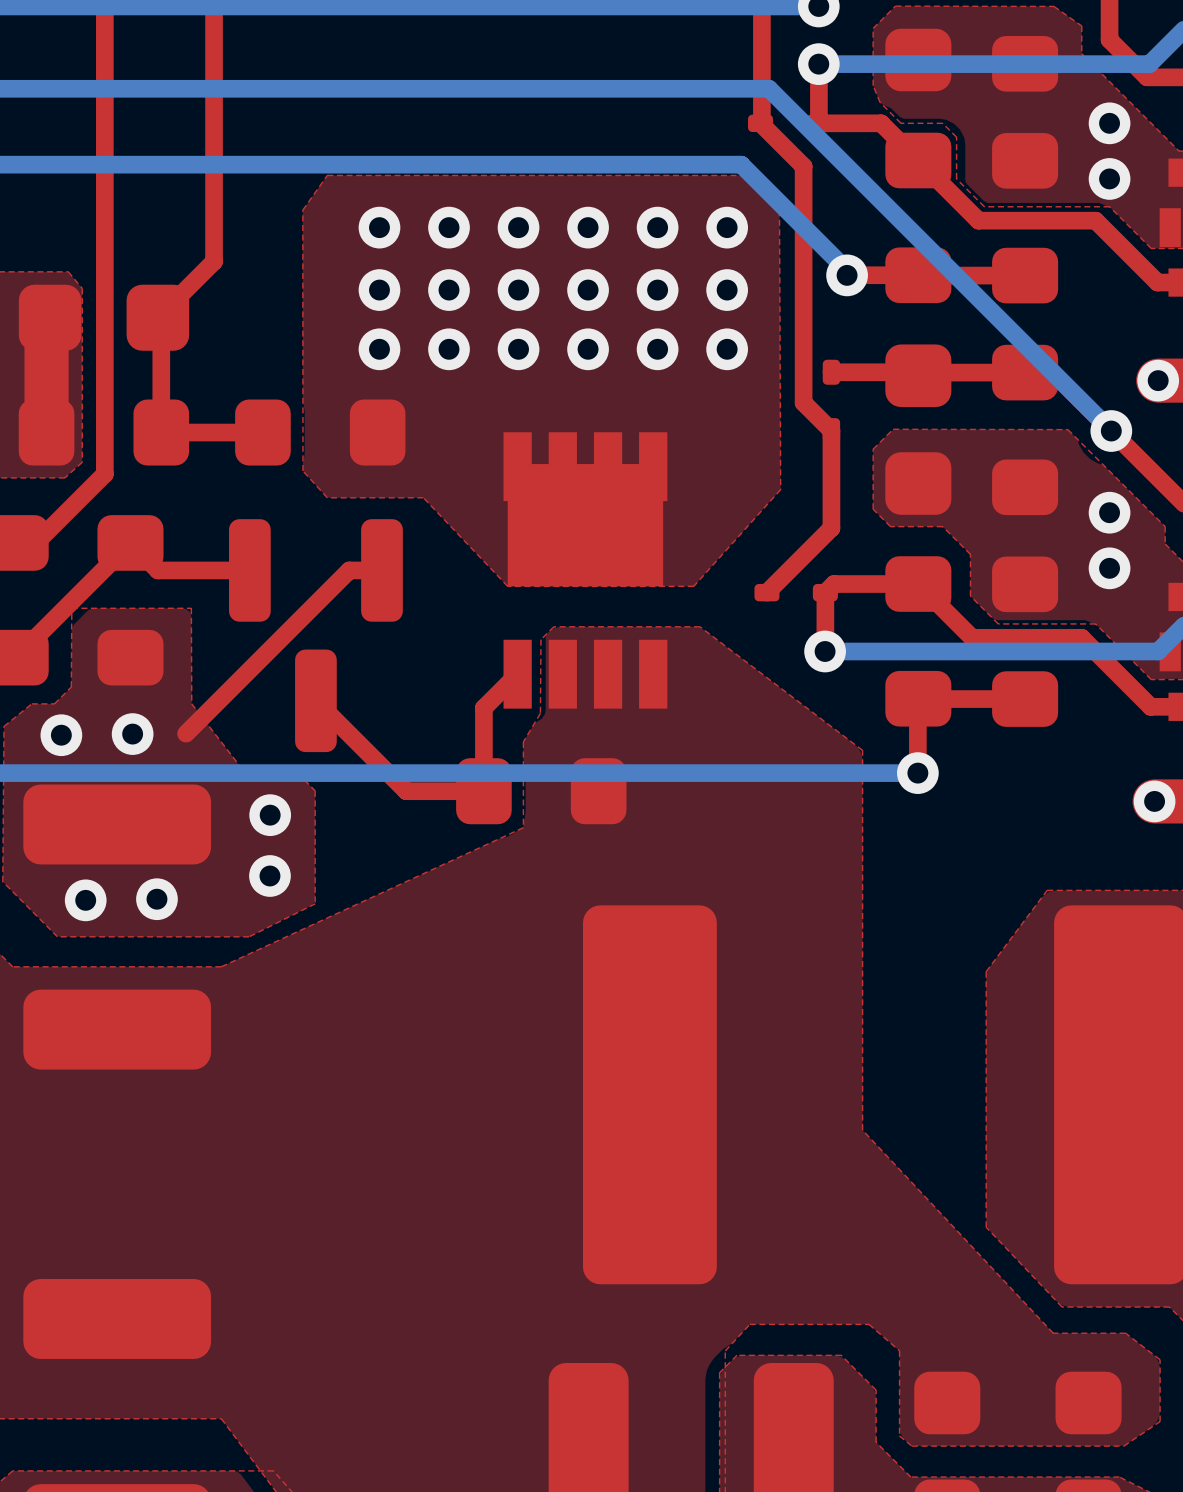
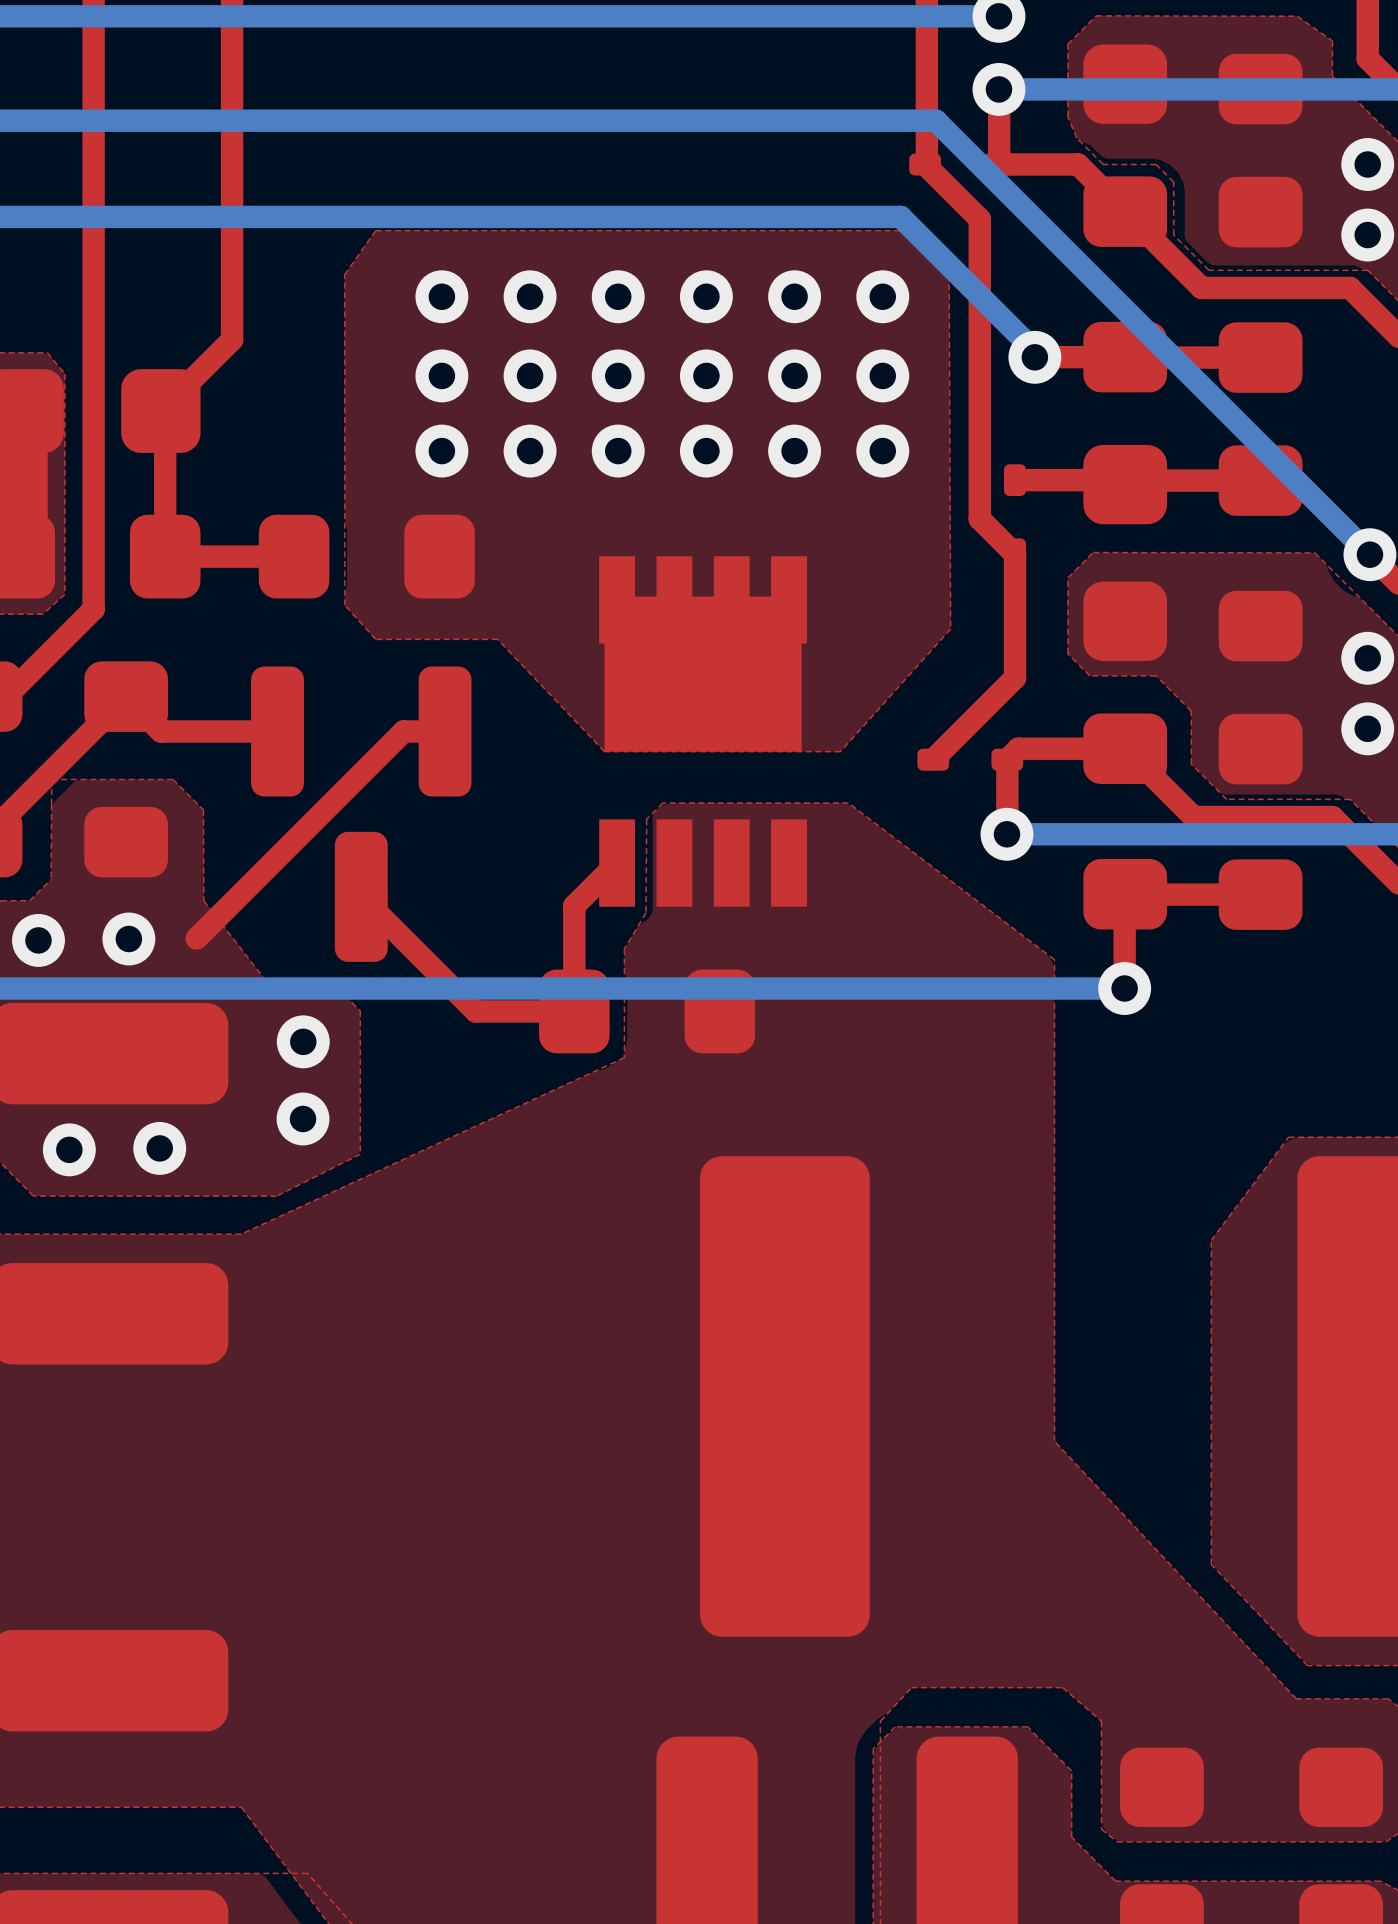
top zone outline: (167, 608) (191, 608) (191, 632) -> (173, 779) (203, 809)

